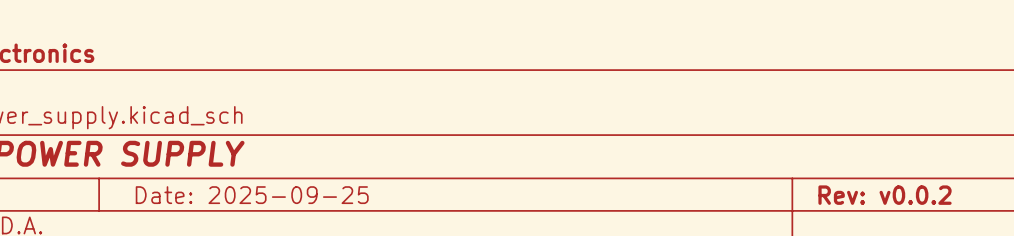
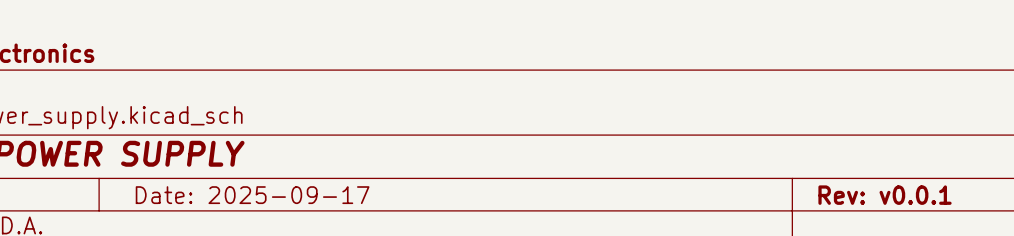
title block: Date: 2025-09-25 (252, 195) -> Date: 2025-09-17 (252, 195)
title block: Rev: v0.0.2 (885, 195) -> Rev: v0.0.1 (885, 195)

